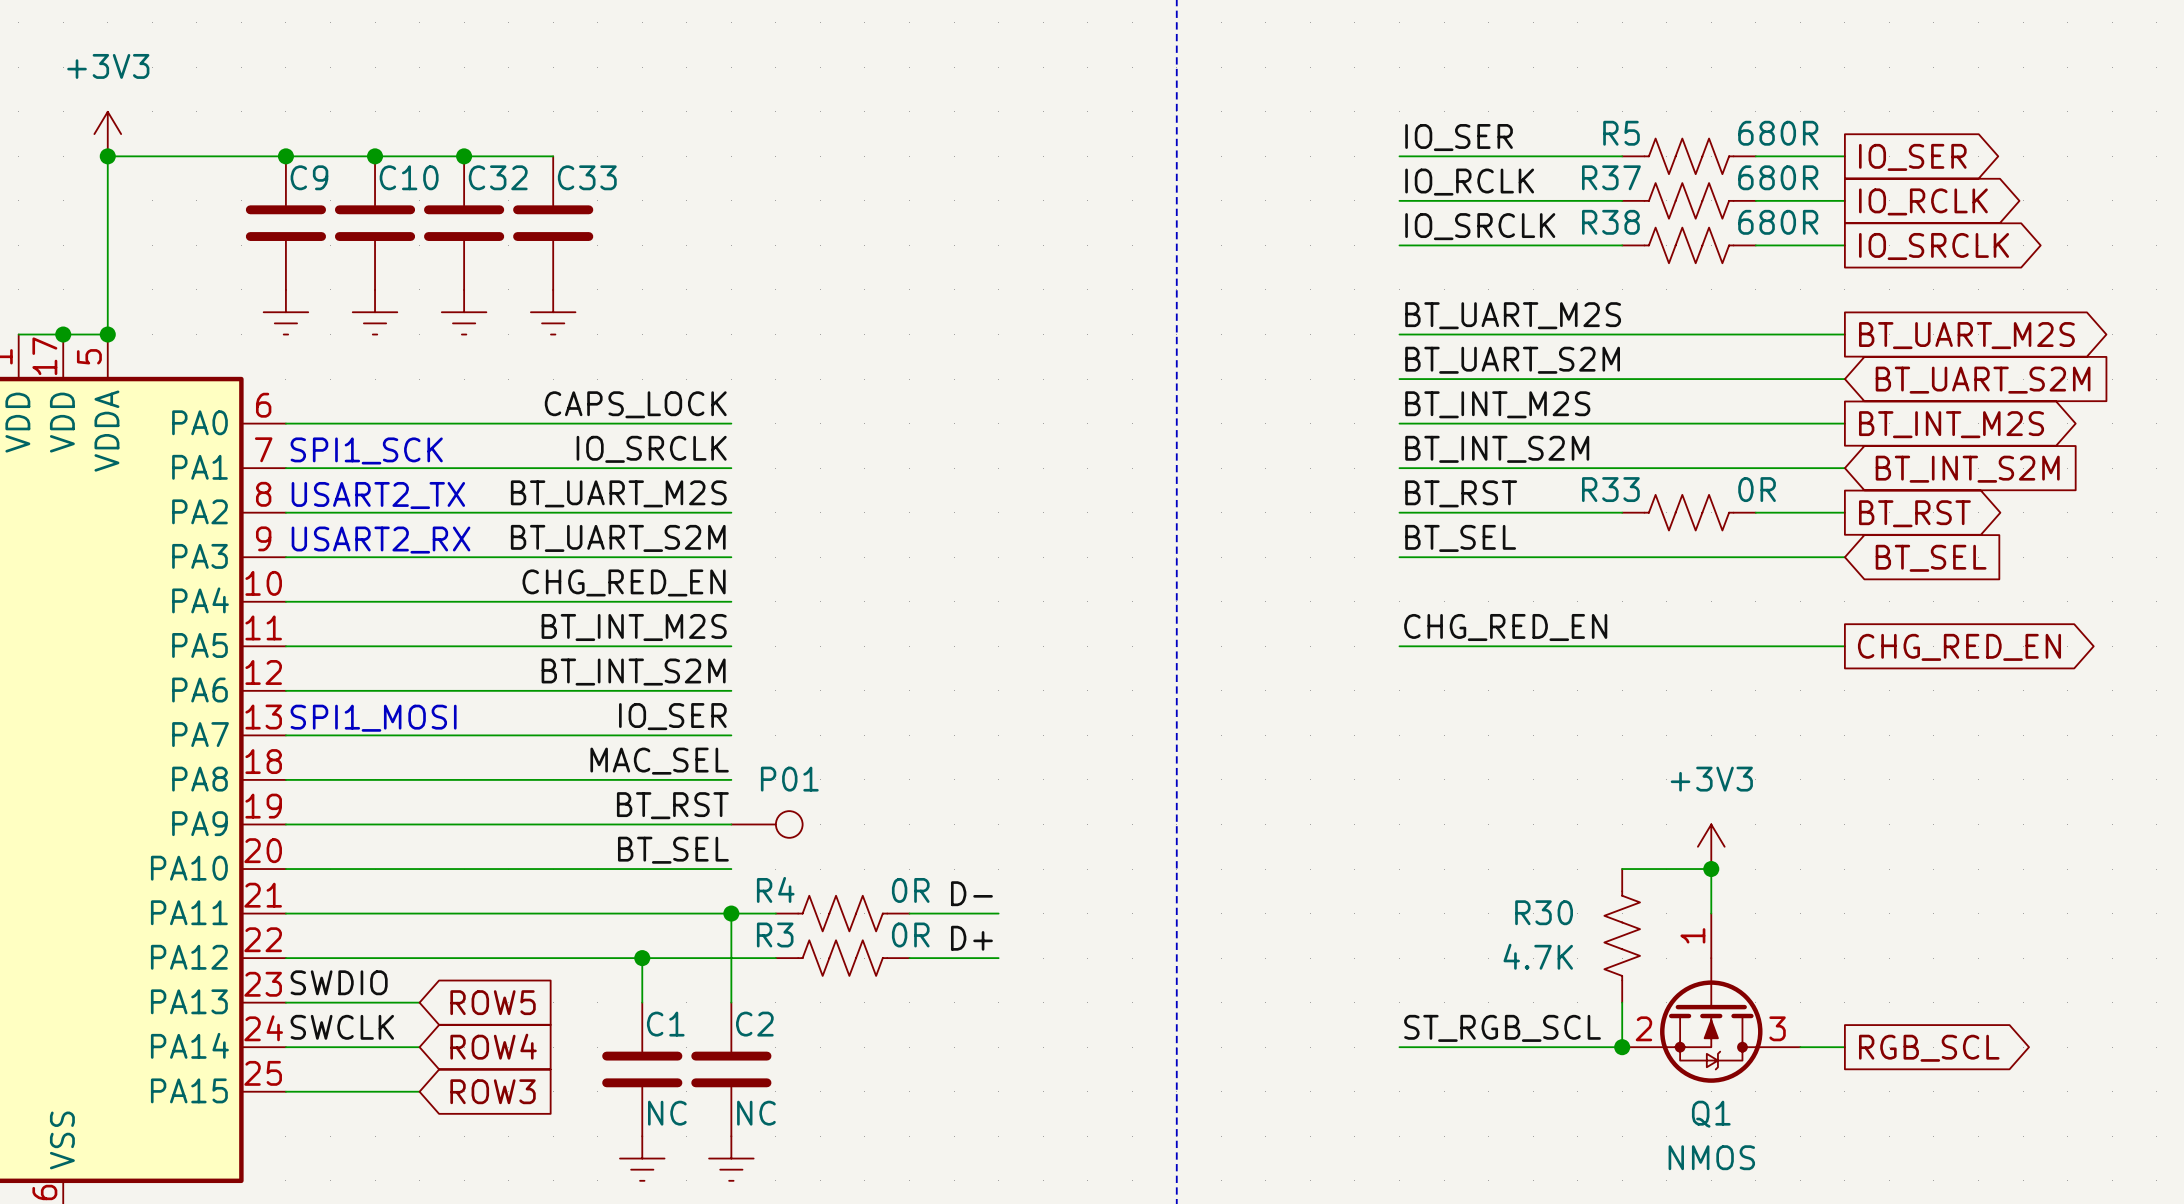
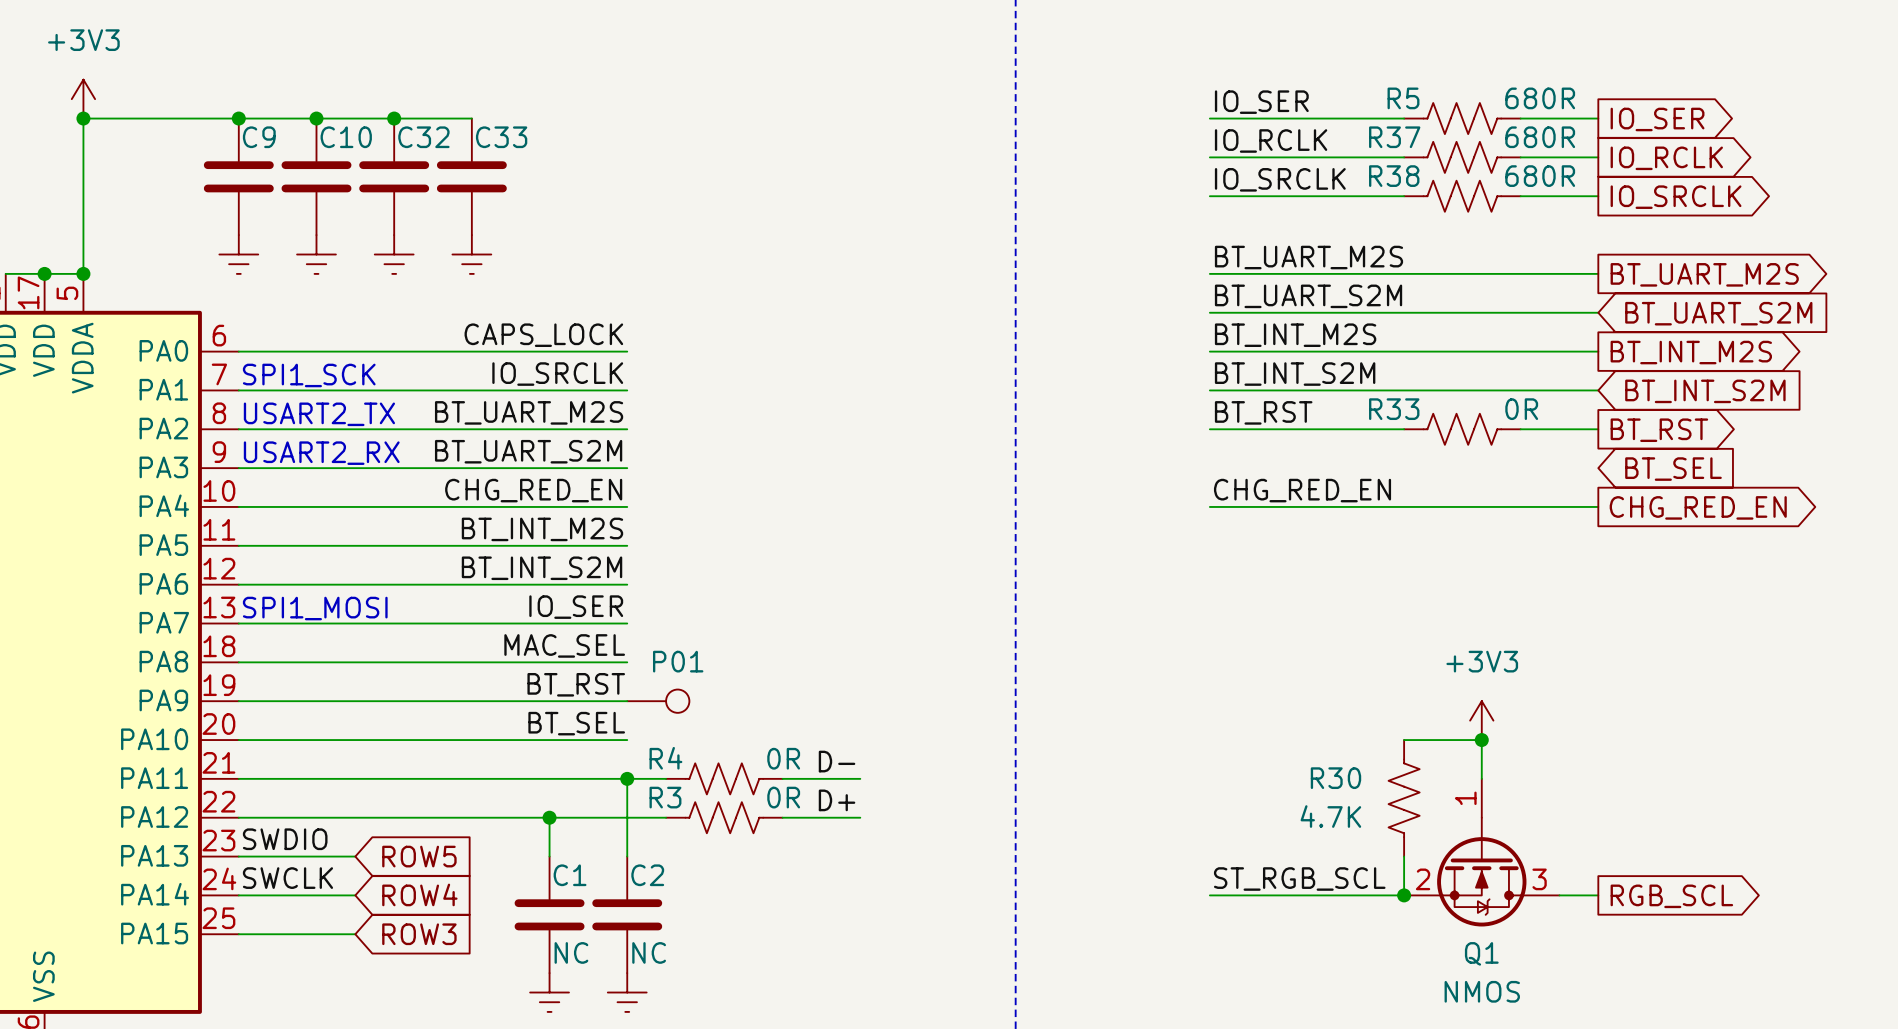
label: BT_SEL (1460, 538) -> none
wire: (1399, 557) (1844, 557) -> (1209, 506) (1598, 506)
label position: CHG_RED_EN (1505, 627) -> CHG_RED_EN (1302, 490)
wire: (1399, 646) (1844, 646) -> none
global label position: CHG_RED_EN (1959, 647) -> CHG_RED_EN (1698, 507)

